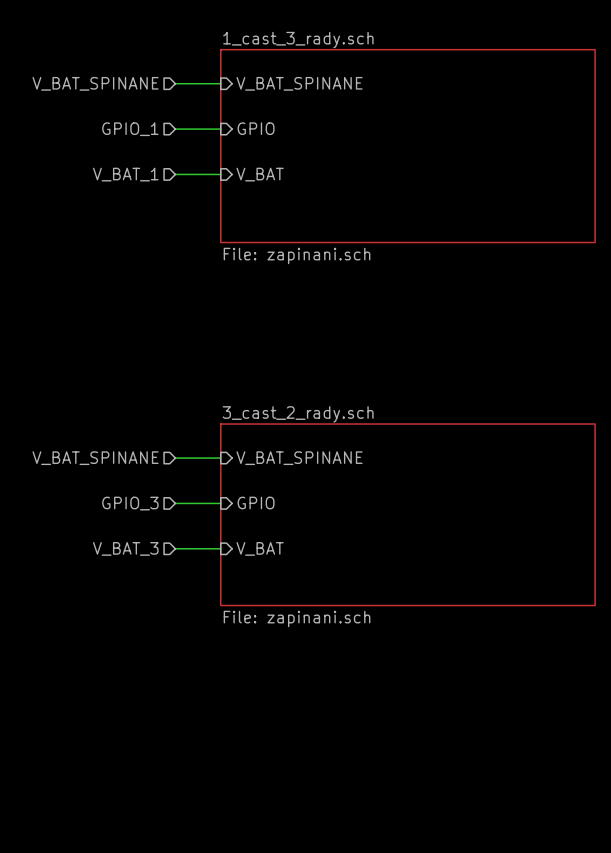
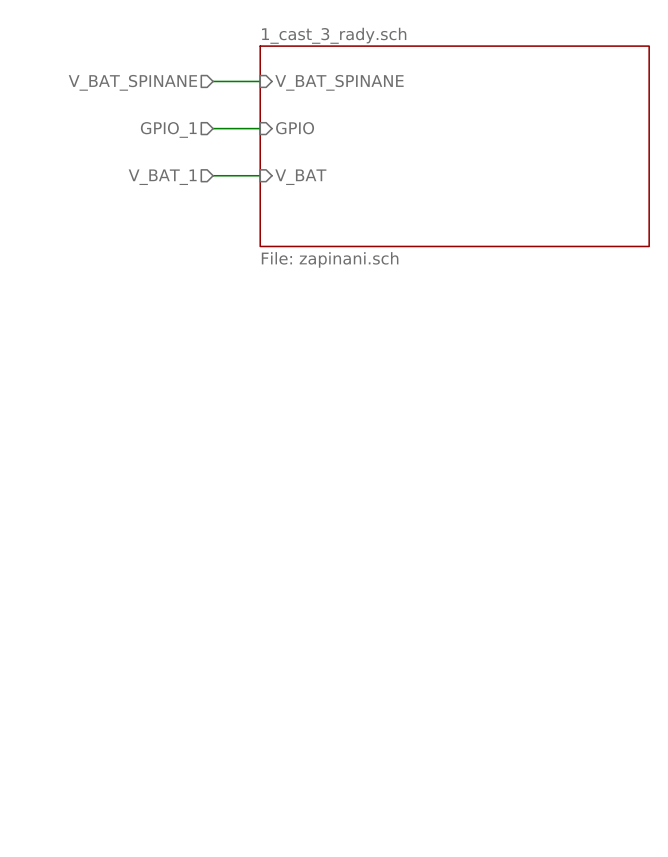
hierarchical label: V_BAT_SPINANE (95, 458) -> none
wire: (175, 458) (220, 458) -> none
sheet pin: V_BAT_SPINANE (299, 458) -> none
hierarchical label: GPIO_3 (130, 503) -> none
wire: (175, 503) (220, 503) -> none
sheet pin: GPIO (256, 503) -> none
sheet 3_cast_2_rady.sch: File: zapinani.sch (407, 514) -> none
hierarchical label: V_BAT_3 (125, 548) -> none
wire: (175, 548) (220, 548) -> none
sheet pin: V_BAT (260, 548) -> none

